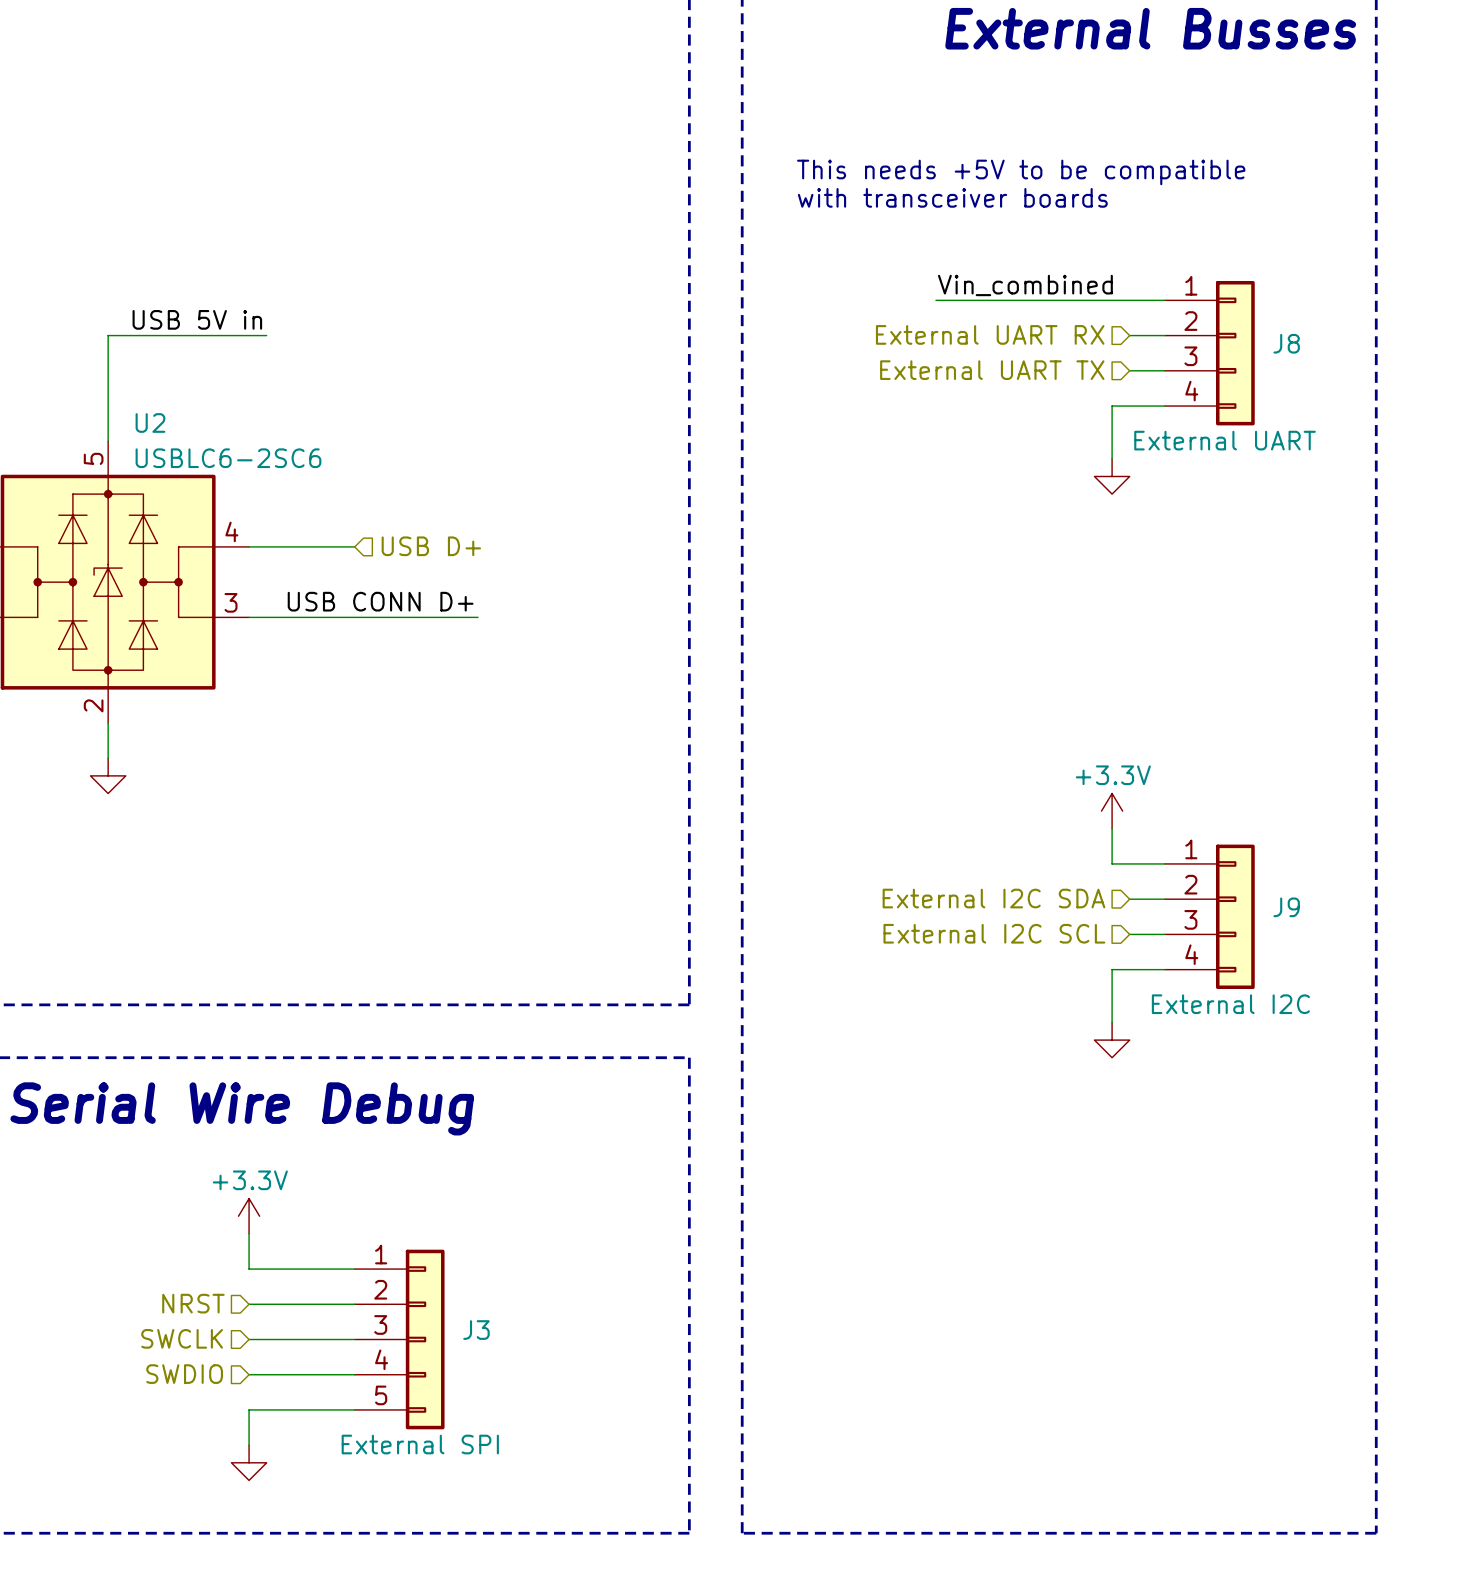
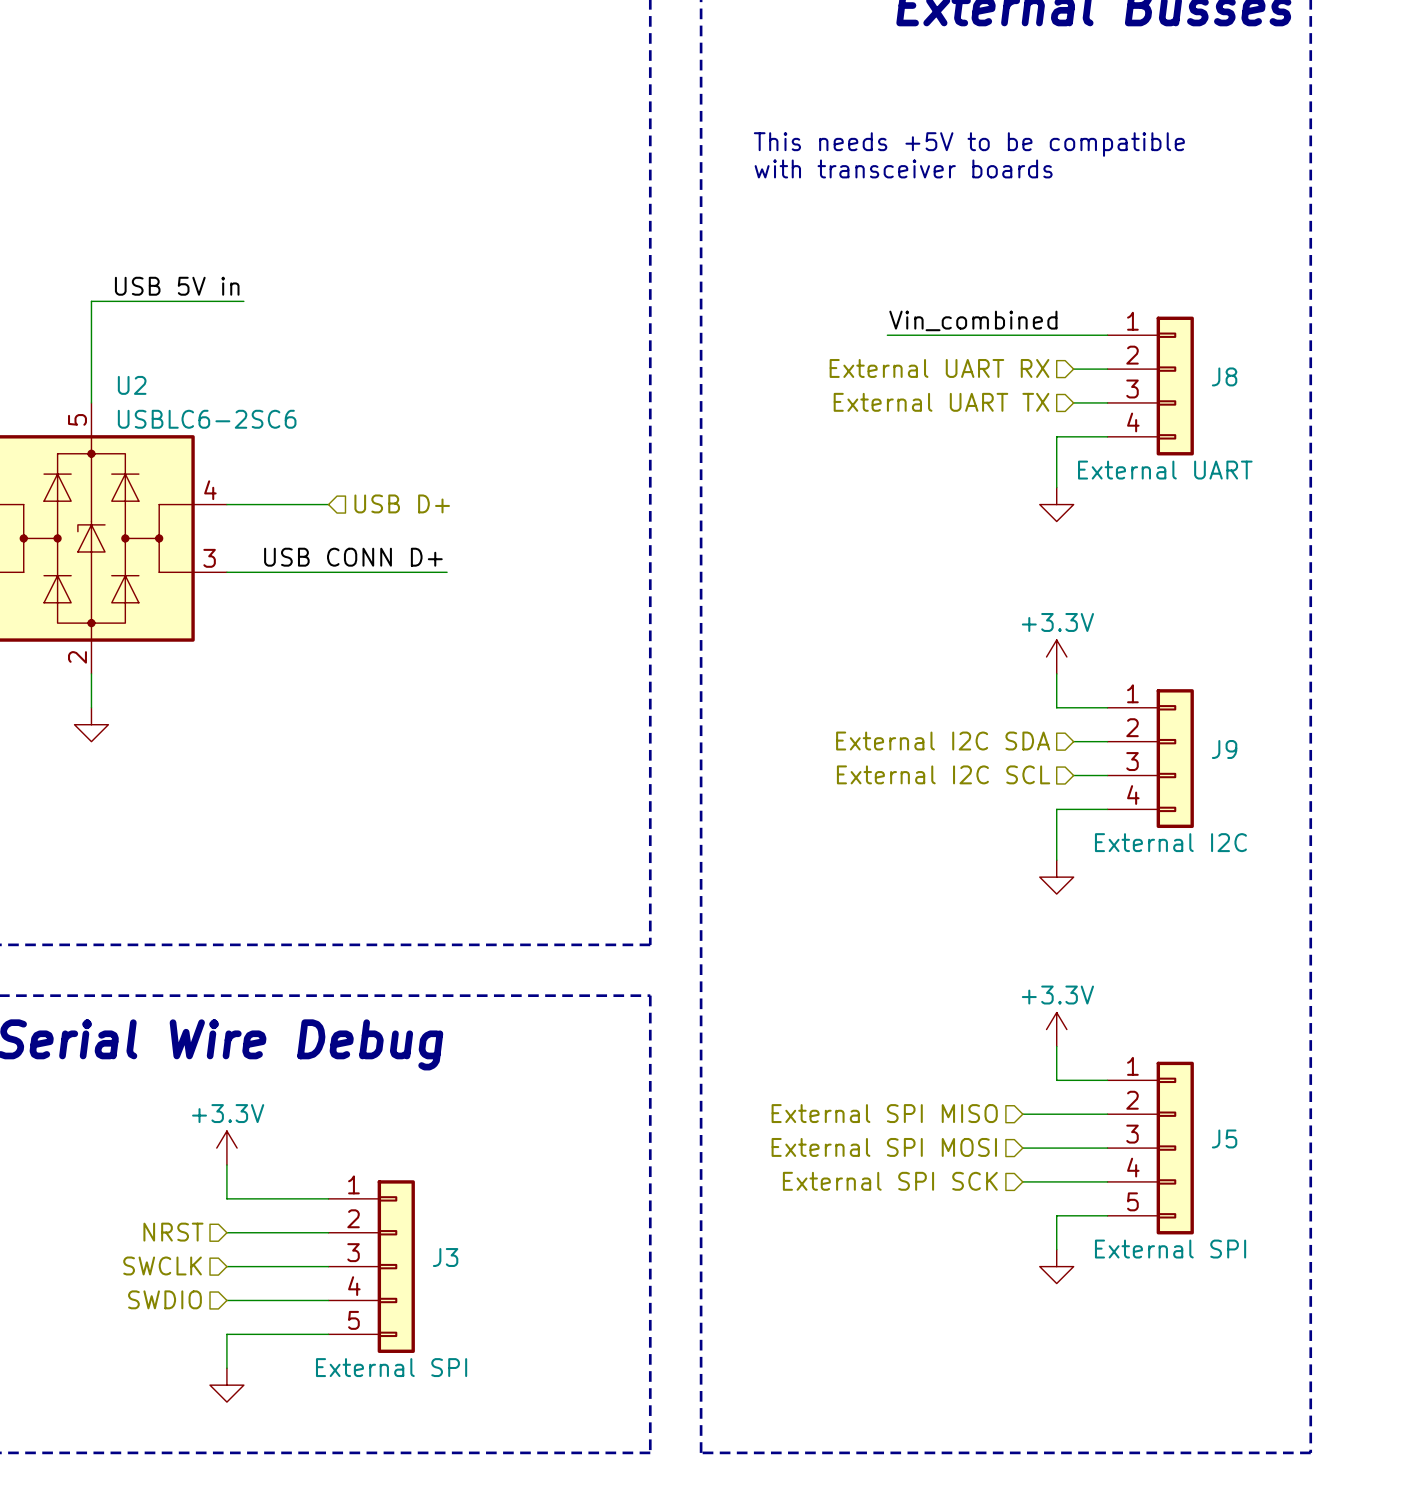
label position: Vin_combined (1025, 285) -> Vin_combined (973, 320)
wire: (935, 300) (1164, 300) -> none
hierarchical label position: External UART RX (990, 334) -> External UART RX (939, 368)
wire: (1129, 335) (1164, 335) -> (1073, 402) (1107, 402)
J8 position: (1209, 353) -> (1150, 386)
wire: none -> (887, 335) (1073, 335)
hierarchical label position: External UART TX (992, 370) -> External UART TX (941, 402)
wire: (1129, 406) (1112, 406) (1112, 458) -> none
power symbol position: (1112, 476) -> (1056, 504)
wire: none -> (1107, 436) (1056, 436) (1056, 487)
wire: none -> (1056, 673) (1056, 707) (1107, 707)
power symbol position: +3.3V (1112, 811) -> +3.3V (1056, 656)
wire: (1112, 828) (1112, 863) -> (1056, 860) (1056, 809)
hierarchical label position: External I2C SDA (993, 898) -> External I2C SDA (943, 741)
wire: (1129, 899) (1164, 899) -> (1073, 741) (1107, 741)
J9 position: (1209, 916) -> (1150, 758)
hierarchical label position: External I2C SCL (994, 933) -> External I2C SCL (943, 774)
wire: (1129, 934) (1164, 934) -> (1073, 775) (1107, 775)
wire: (1164, 969) (1112, 969) (1112, 1022) -> none
power symbol position: (1112, 1040) -> (1056, 877)
power symbol: none -> +3.3V (1056, 1029)
wire: none -> (1056, 1046) (1056, 1080) (1107, 1080)
hierarchical label: none -> External SPI MISO (884, 1113)
wire: none -> (1022, 1114) (1107, 1114)
hierarchical label: none -> External SPI MOSI (884, 1147)
wire: none -> (1022, 1148) (1107, 1148)
J5: none -> External SPI (1150, 1148)
hierarchical label: none -> External SPI SCK (890, 1181)
wire: none -> (1022, 1181) (1107, 1181)
wire: none -> (1107, 1215) (1056, 1215) (1056, 1249)
power symbol: none -> (1056, 1266)

